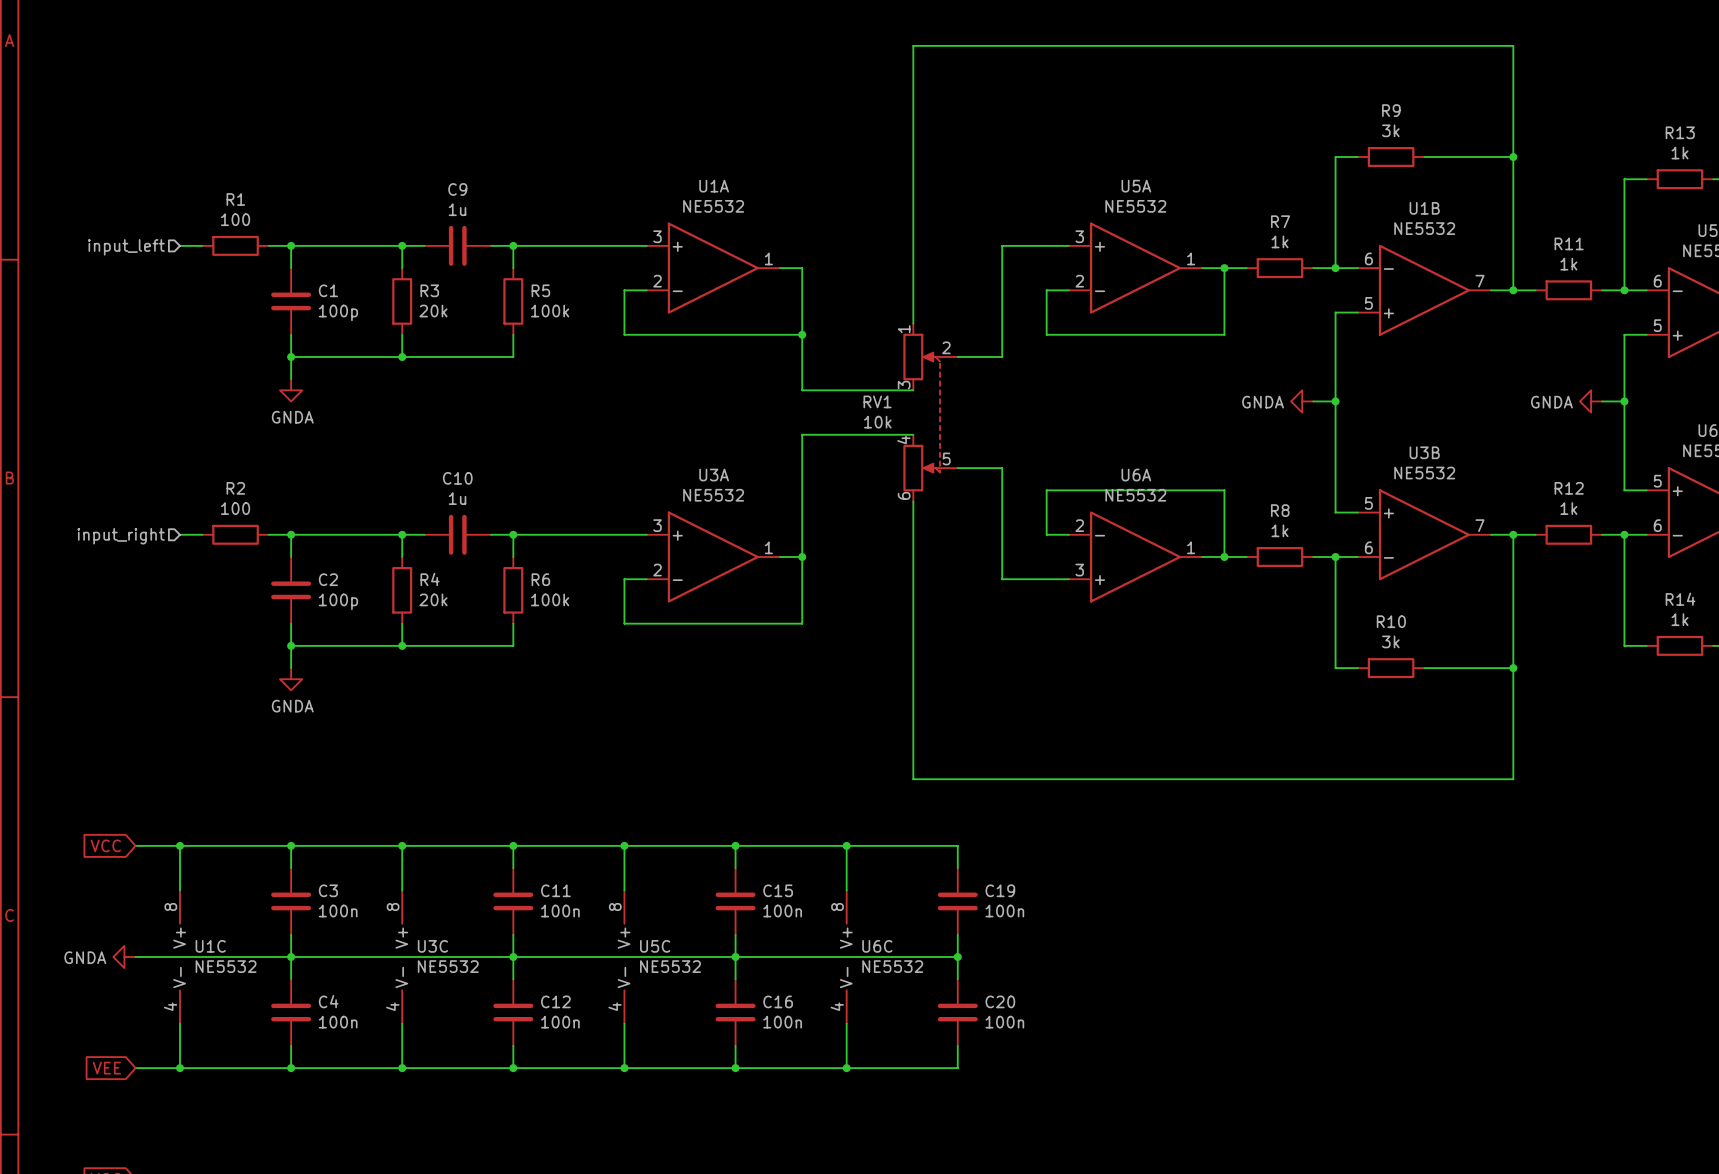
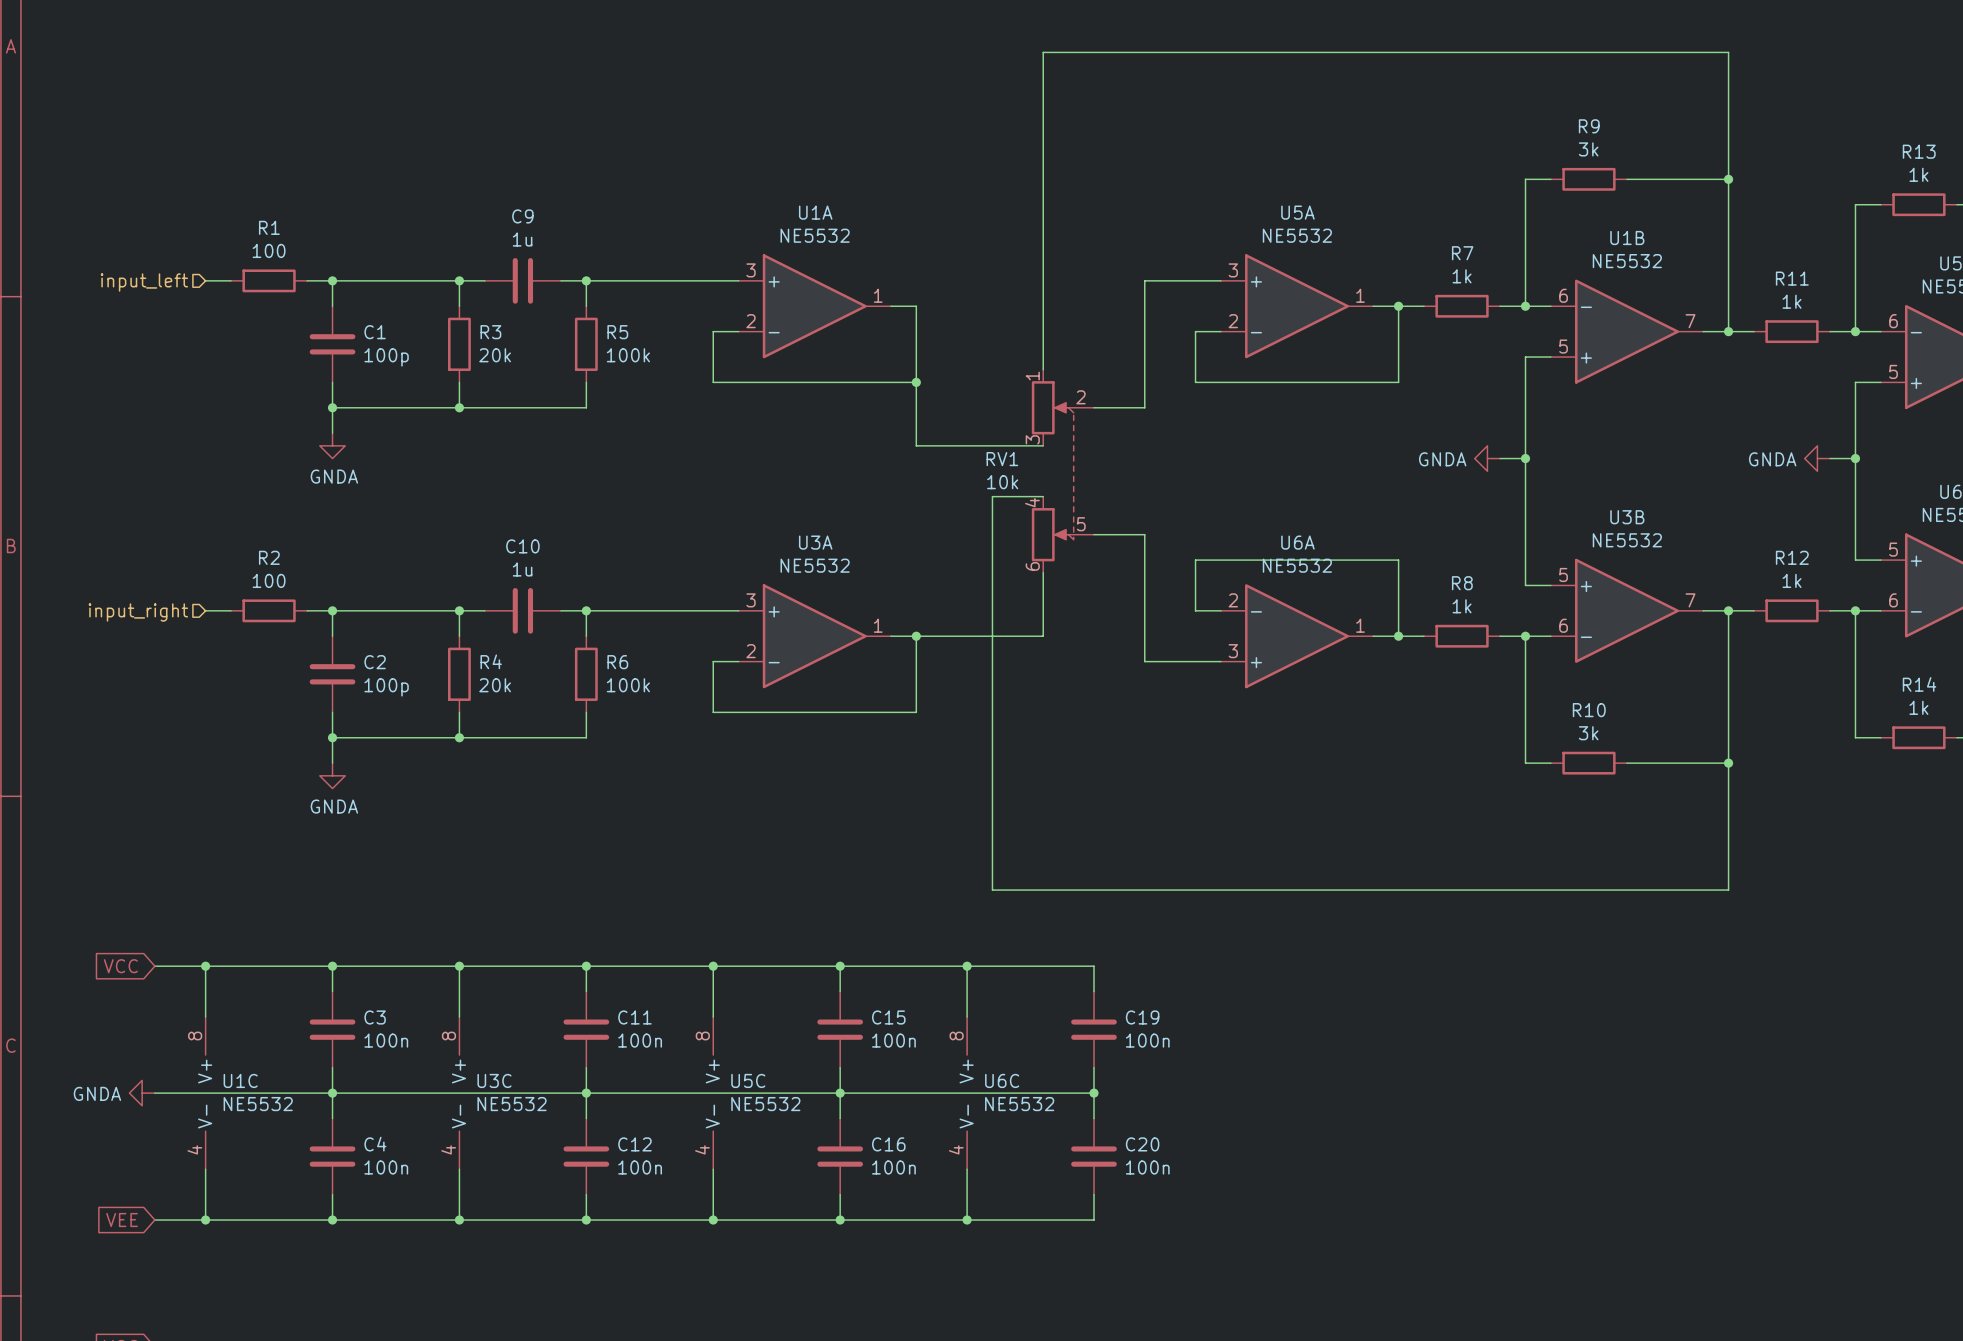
wire: (868, 434) (802, 434) (802, 557) -> (1043, 636) (916, 636)
wire: (913, 557) (913, 779) -> (992, 496) (992, 890) (1043, 890)

